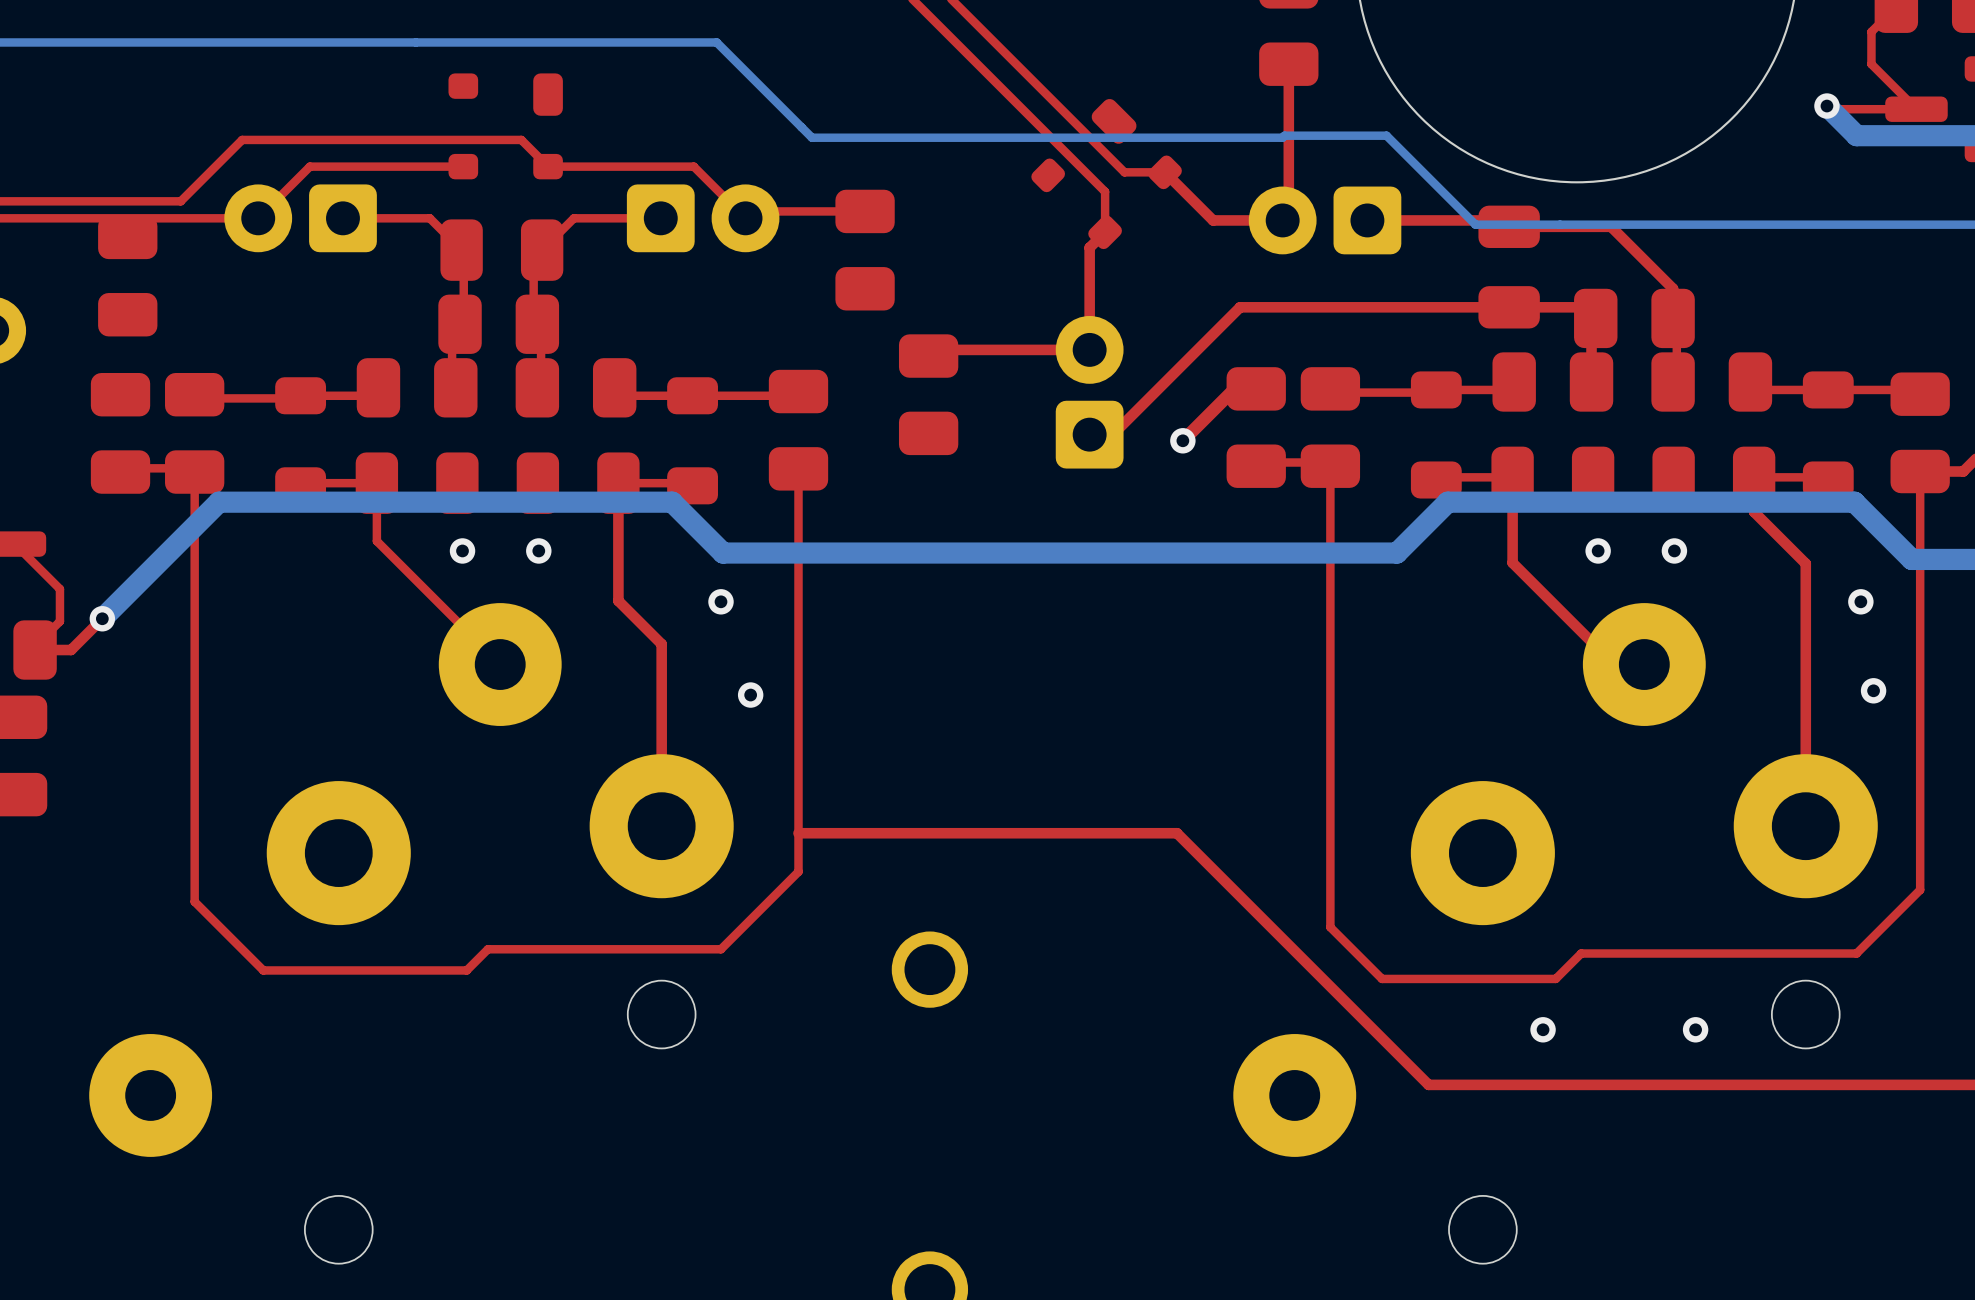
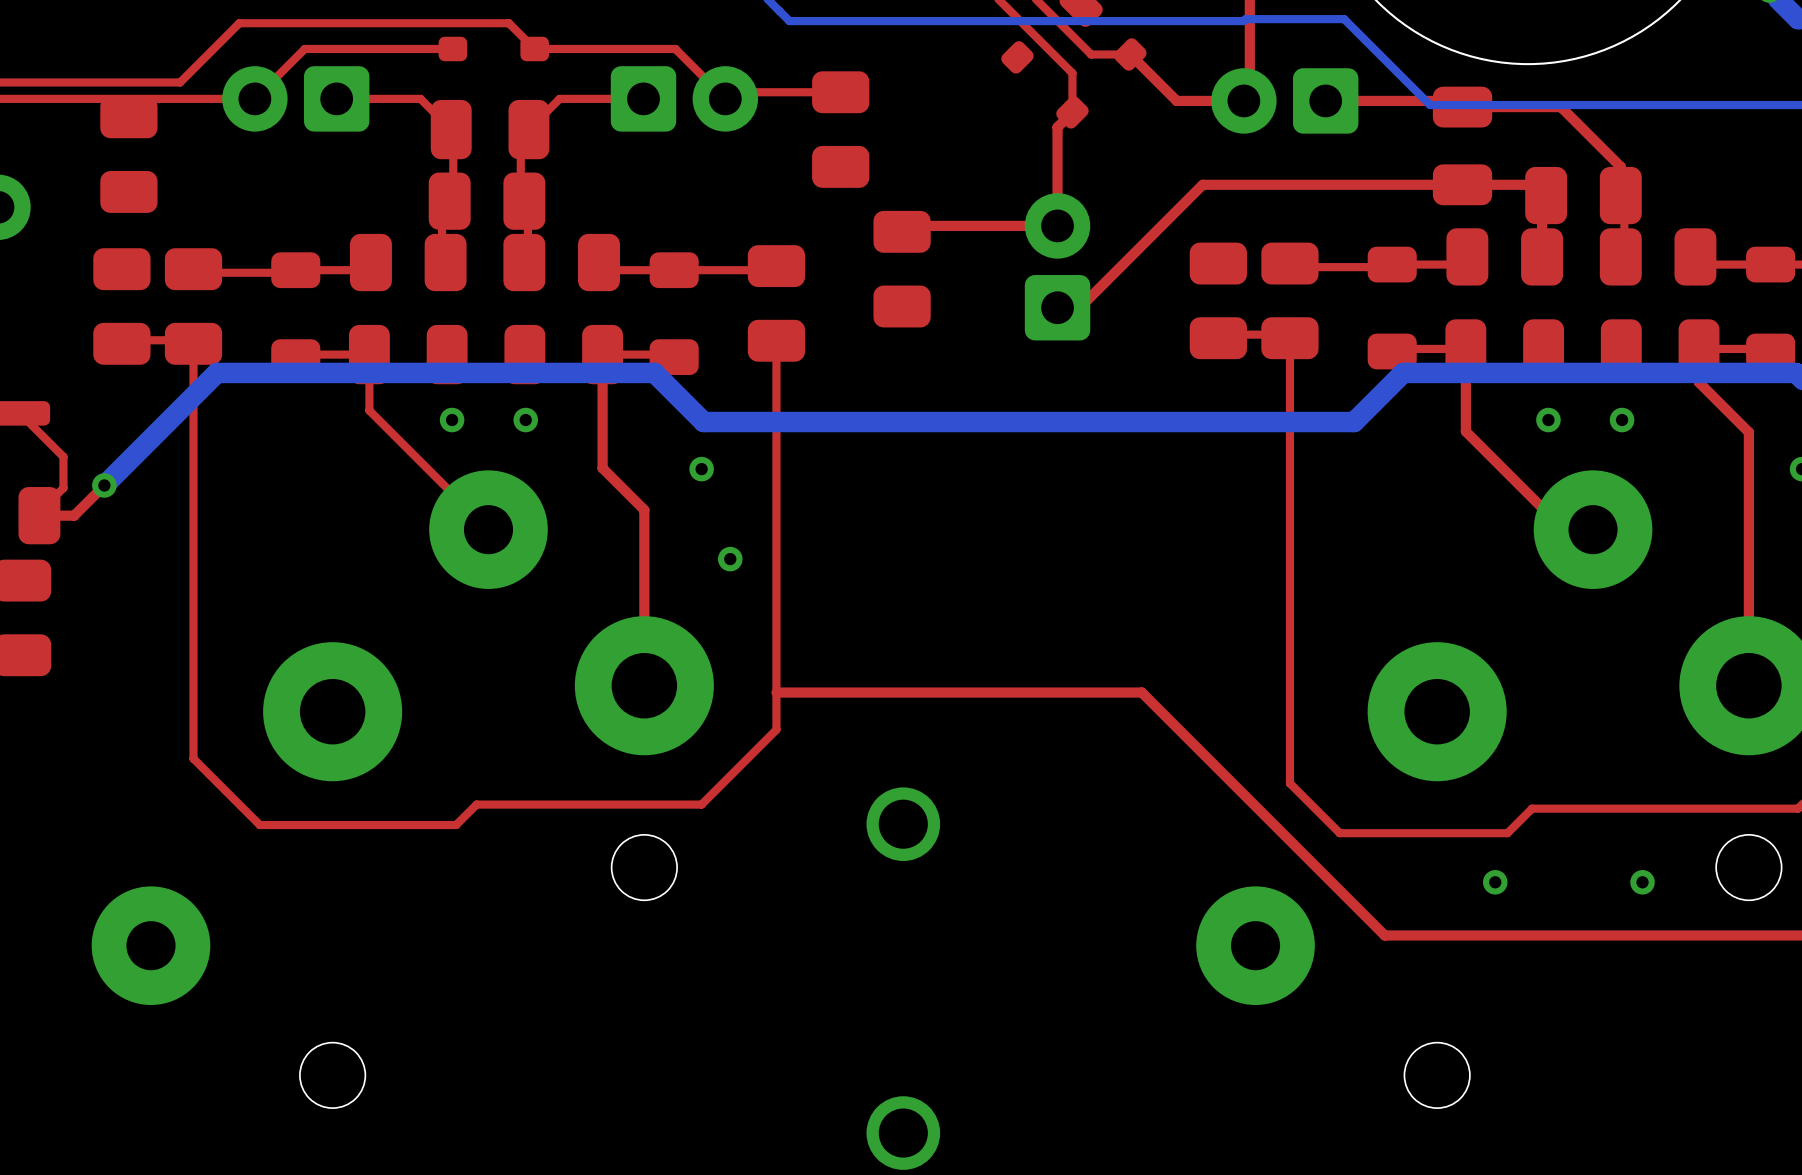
top track: (1256, 388) (1234, 388) (1182, 440) -> none
via: (1182, 440) -> none

